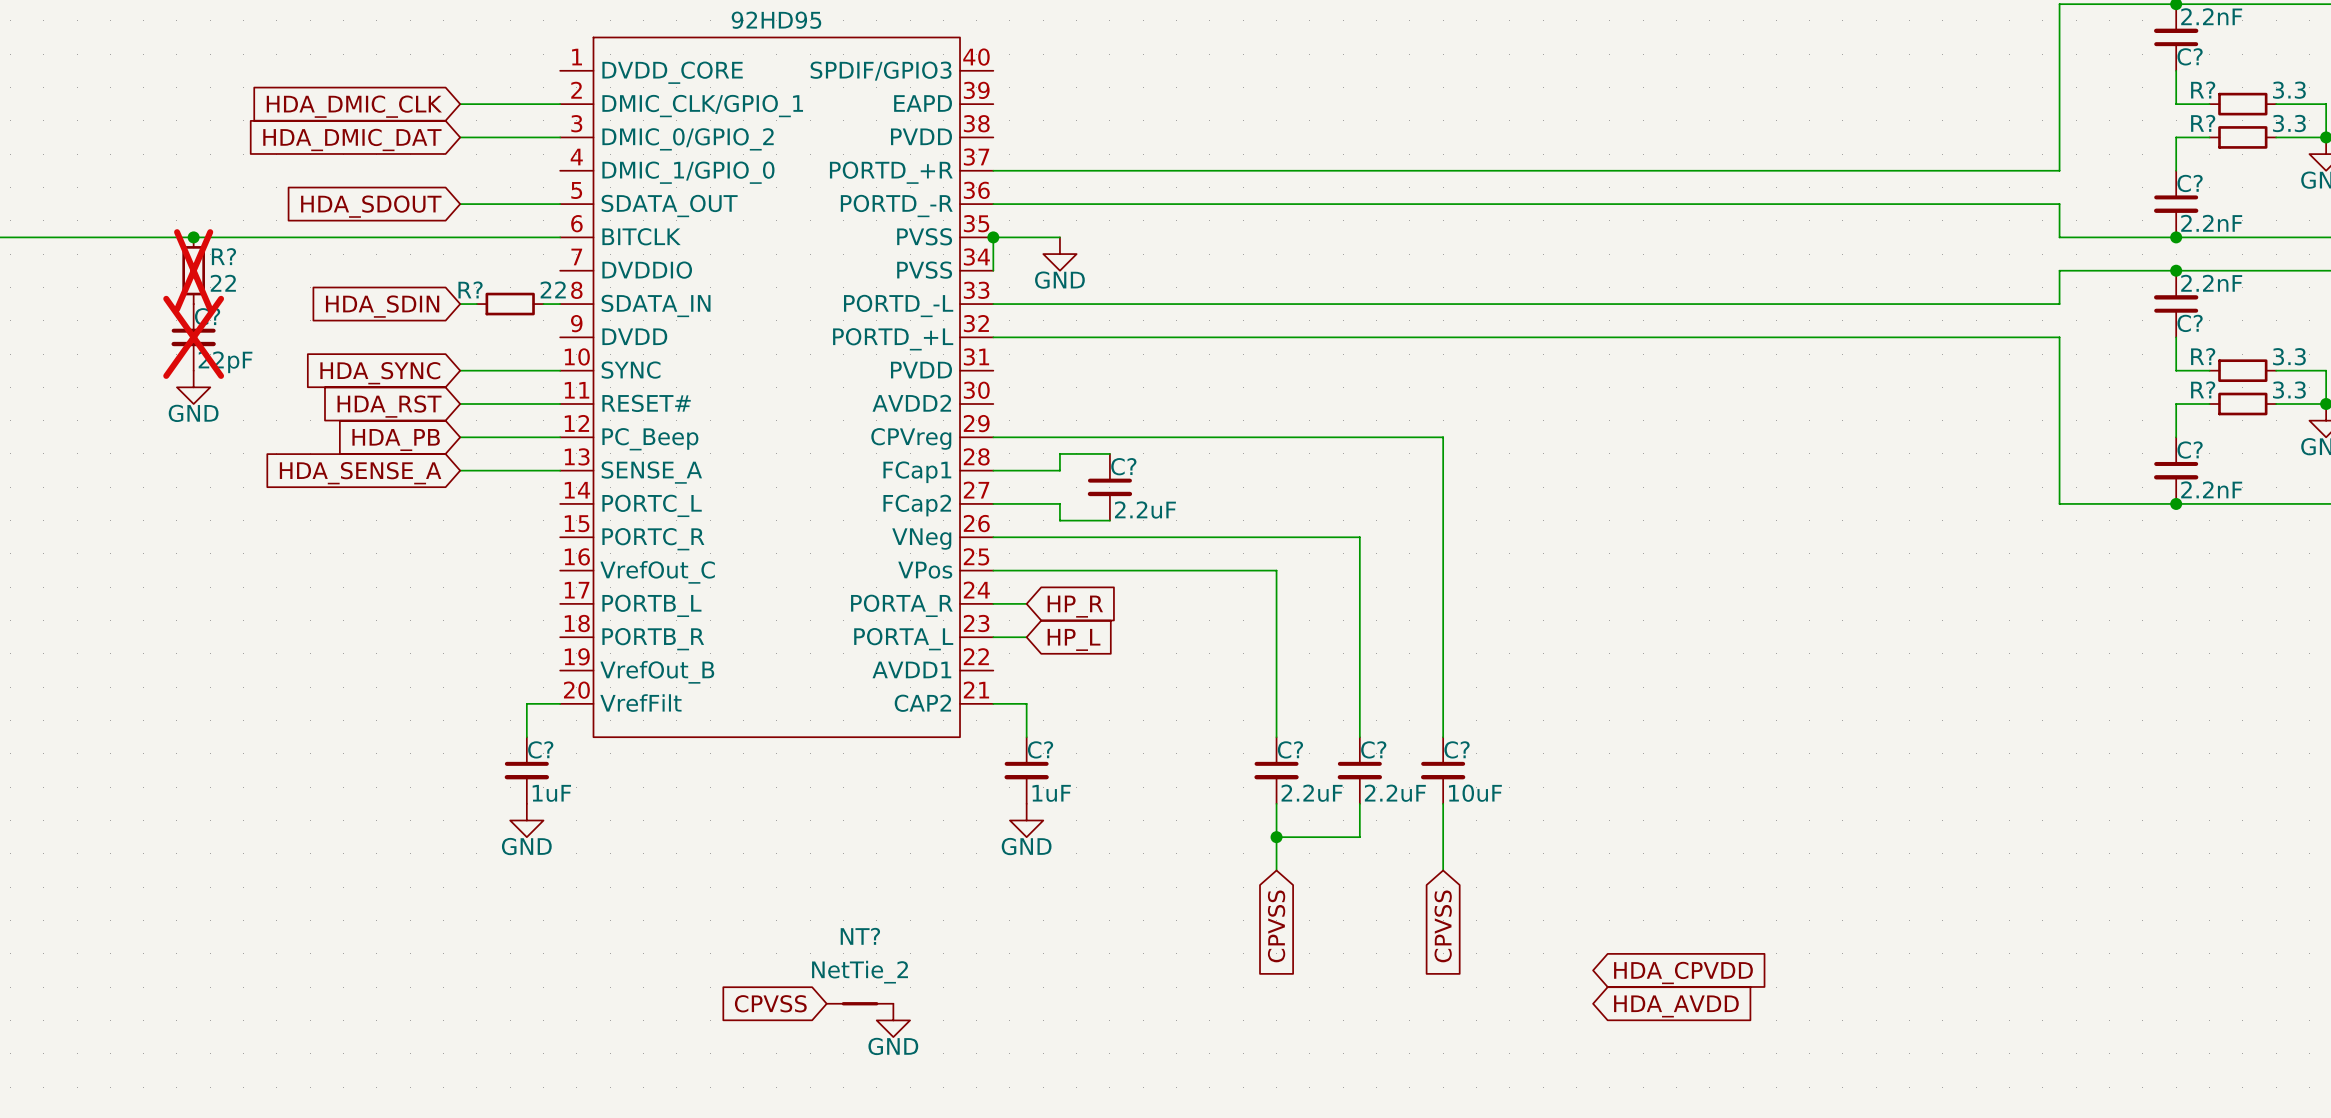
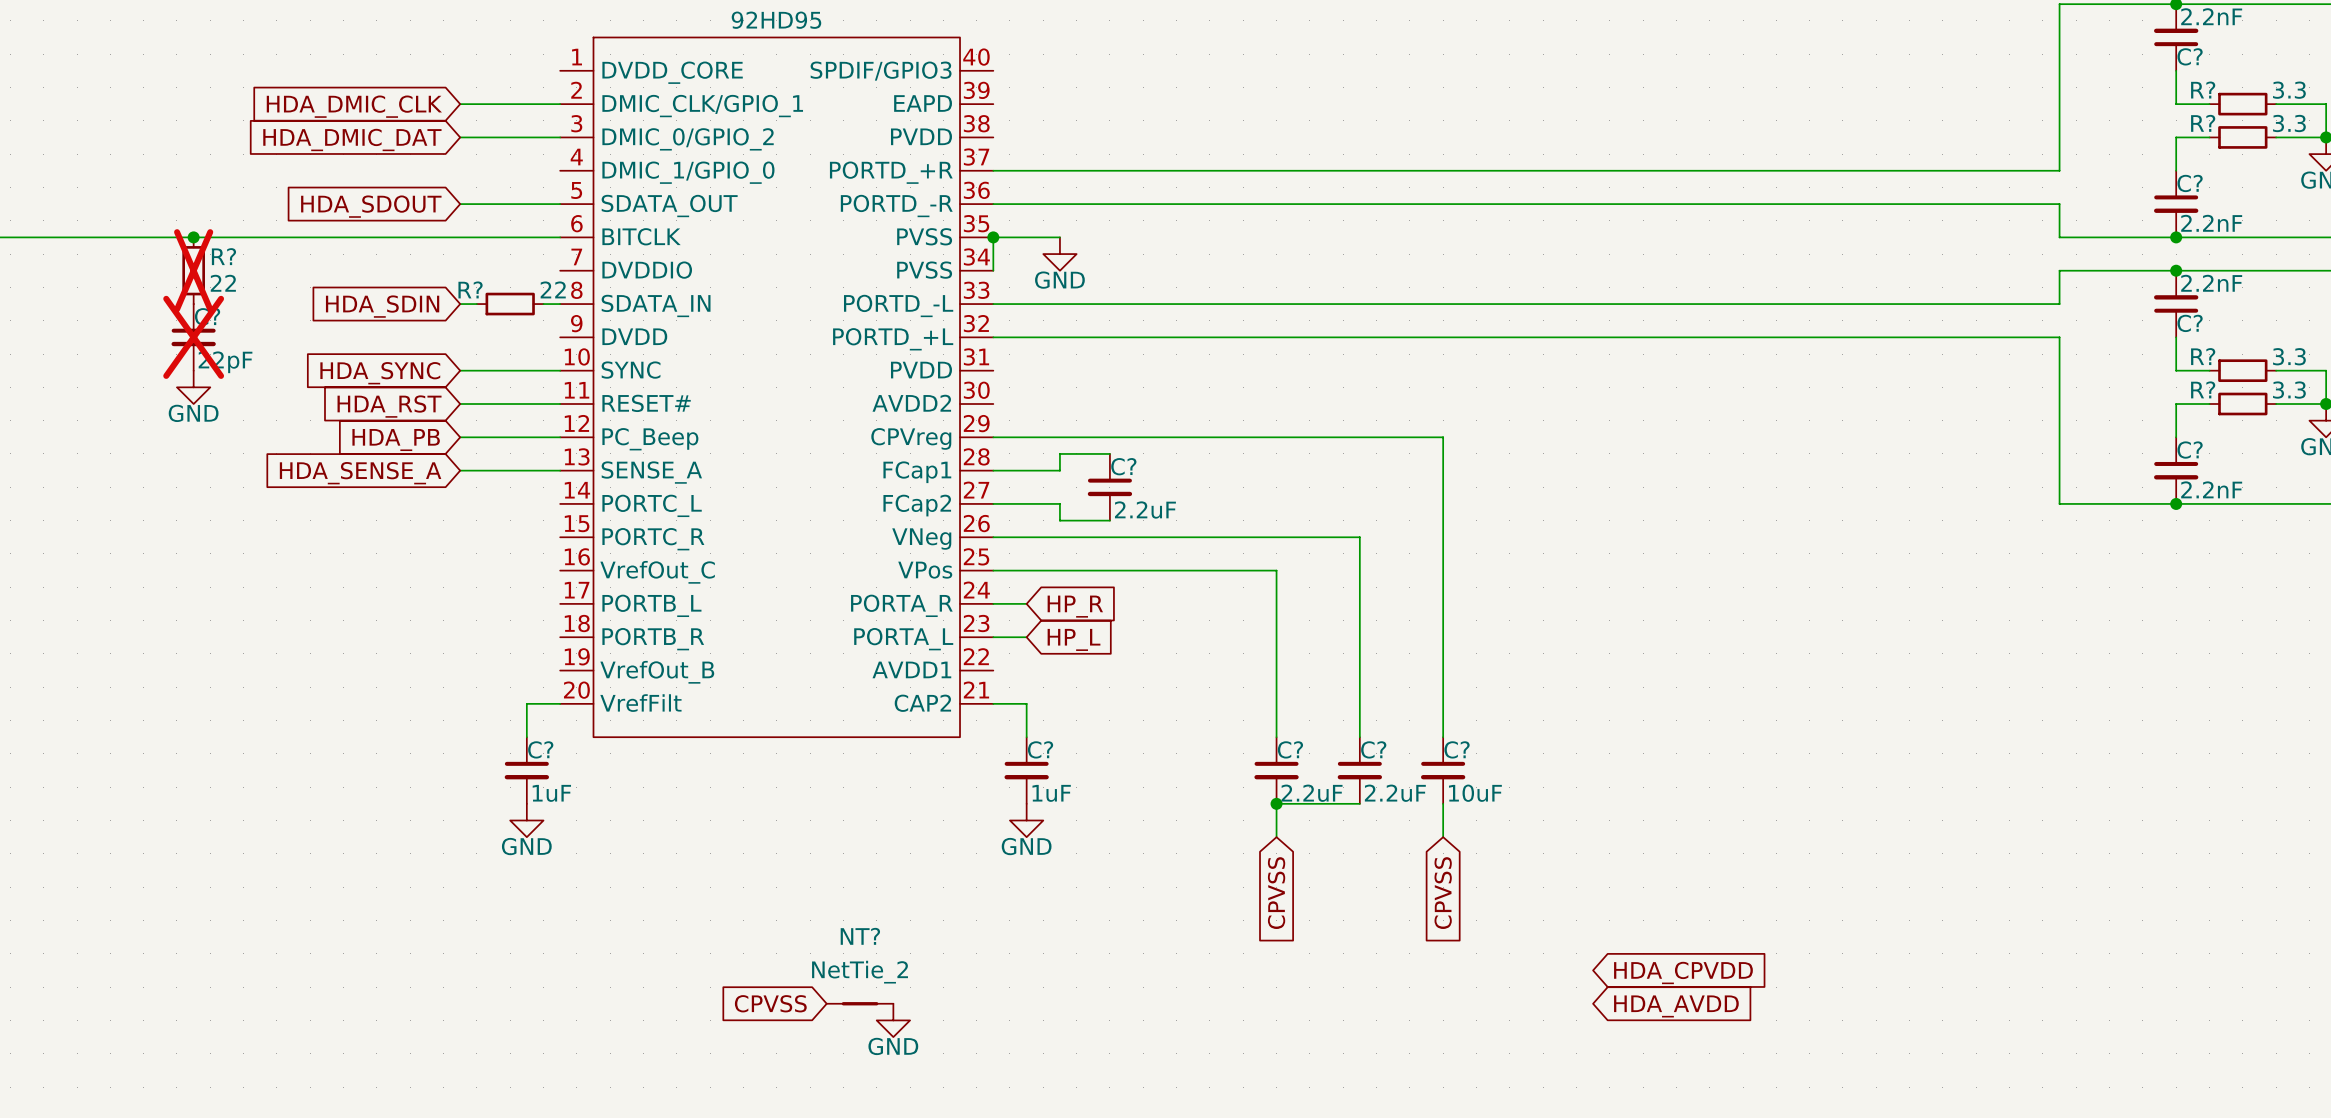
wire: (1359, 803) (1359, 837) (1276, 837) (1276, 870) -> (1359, 803) (1276, 803)
junction position: (1276, 837) -> (1276, 803)
wire: (1443, 837) (1443, 870) -> none
global label position: CPVSS (1276, 926) -> CPVSS (1276, 893)
global label position: CPVSS (1443, 926) -> CPVSS (1443, 893)

